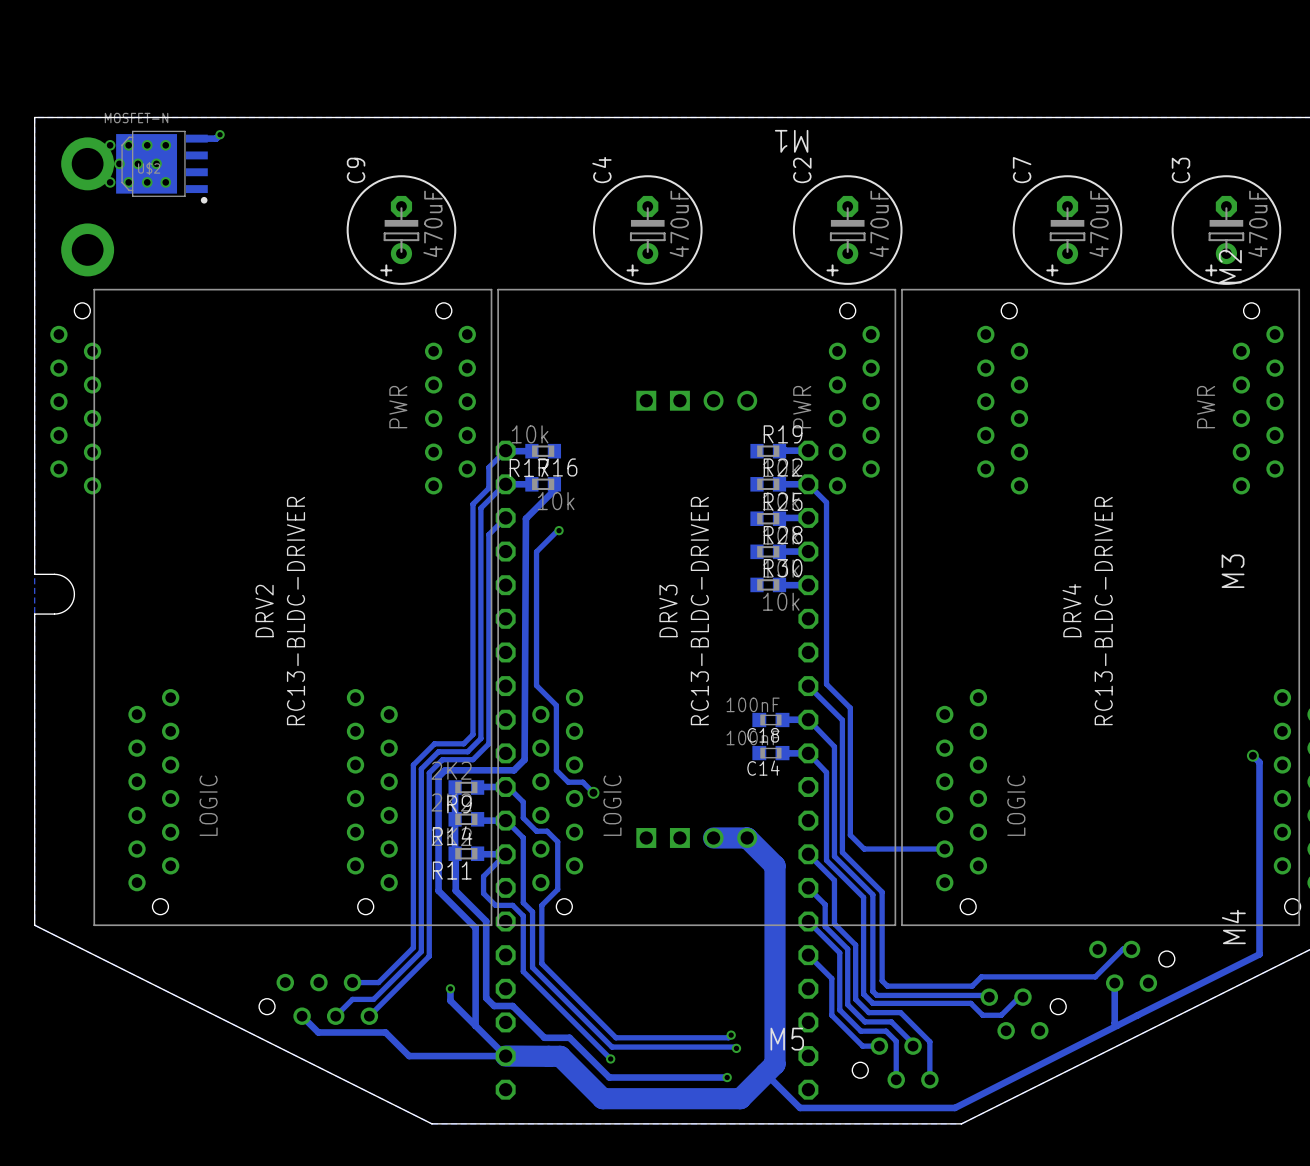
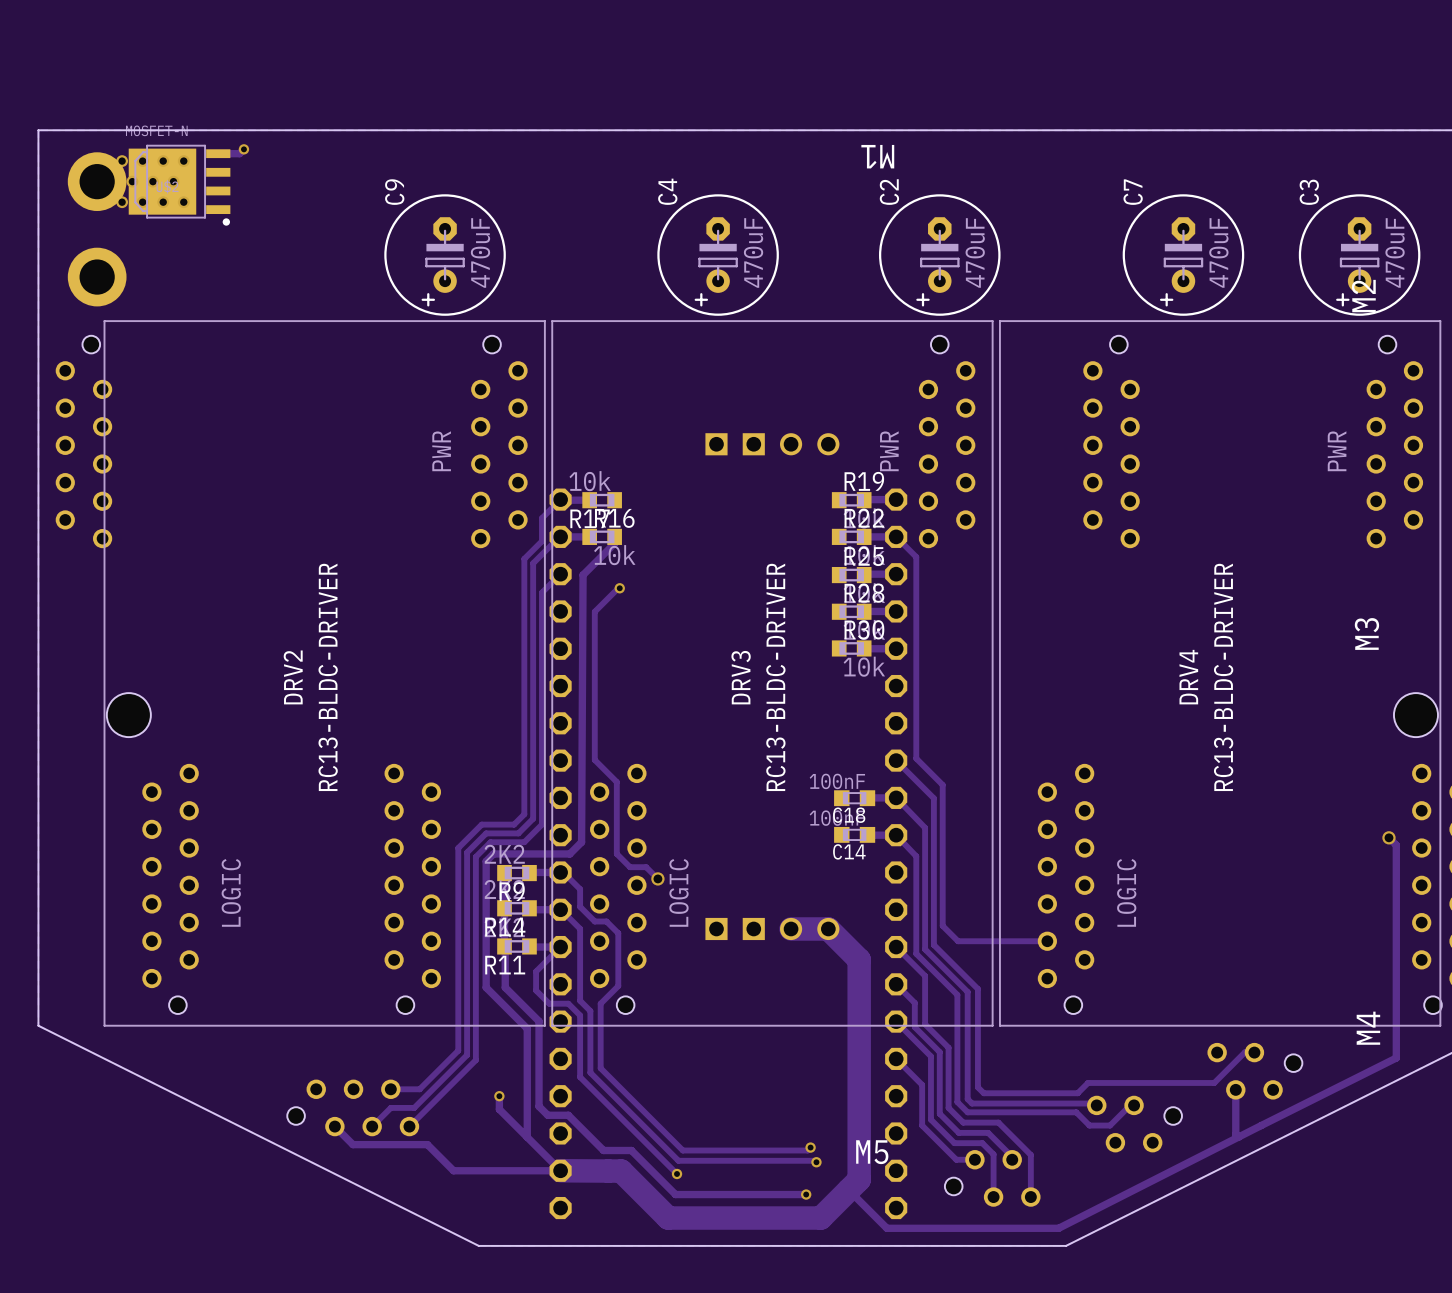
board edge: (34, 574) (57, 574) (64, 576) (71, 584) (74, 594) (71, 604) (64, 611) (57, 613) (34, 614) -> (38, 636) (38, 680)
hole: none -> (128, 715)
hole: none -> (1415, 715)

